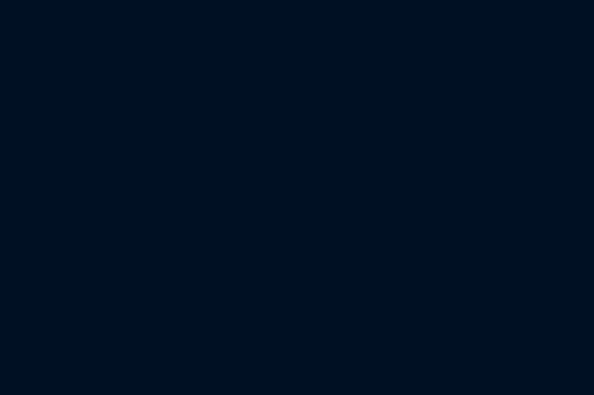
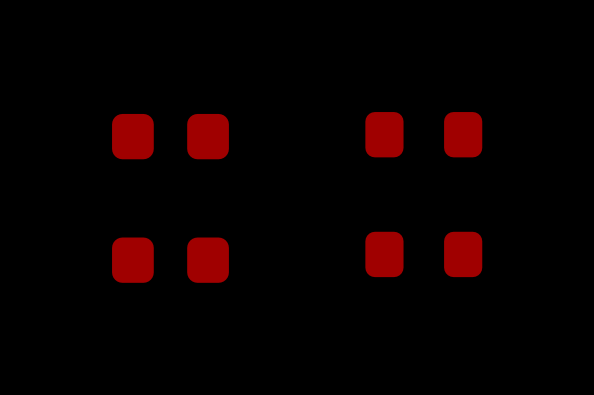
part: none -> (423, 134)
part: none -> (170, 136)
part: none -> (423, 254)
part: none -> (170, 260)

